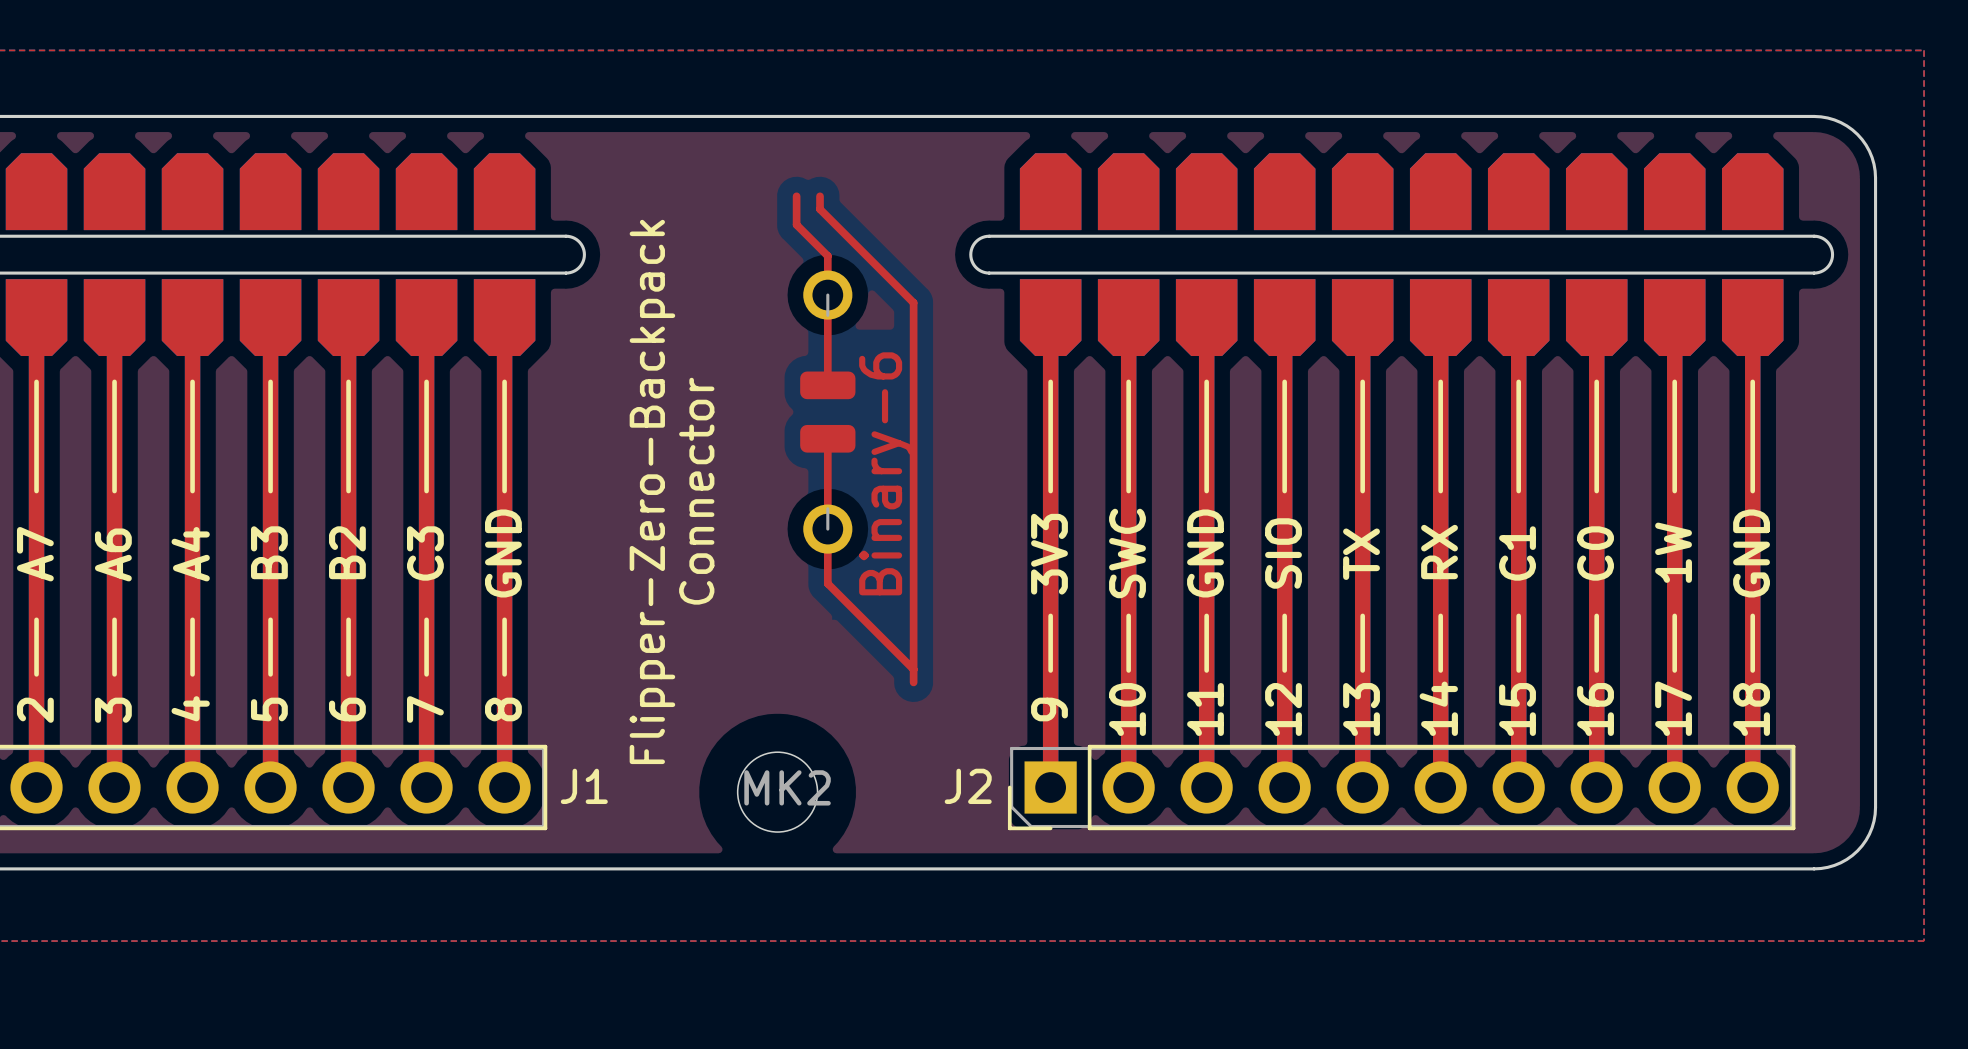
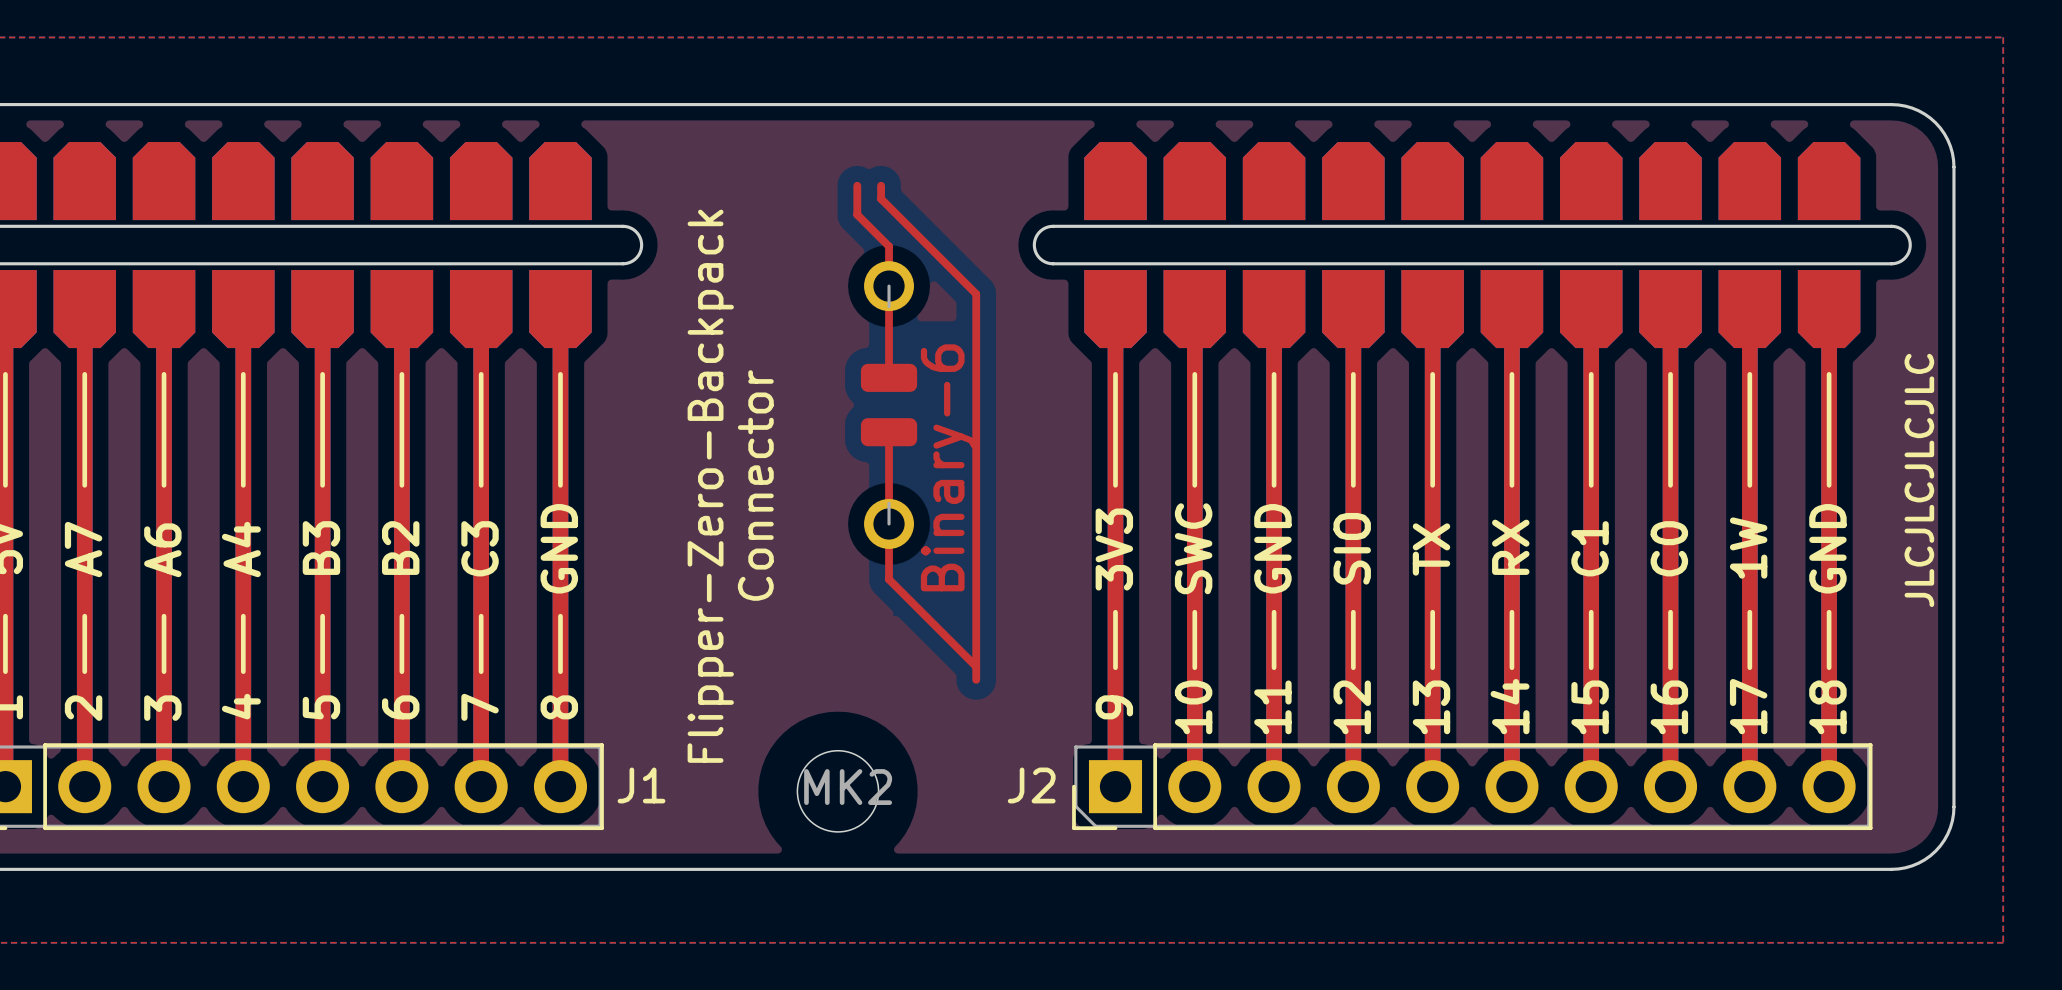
text: none -> JLCJLCJLCJLC (1919, 480)

